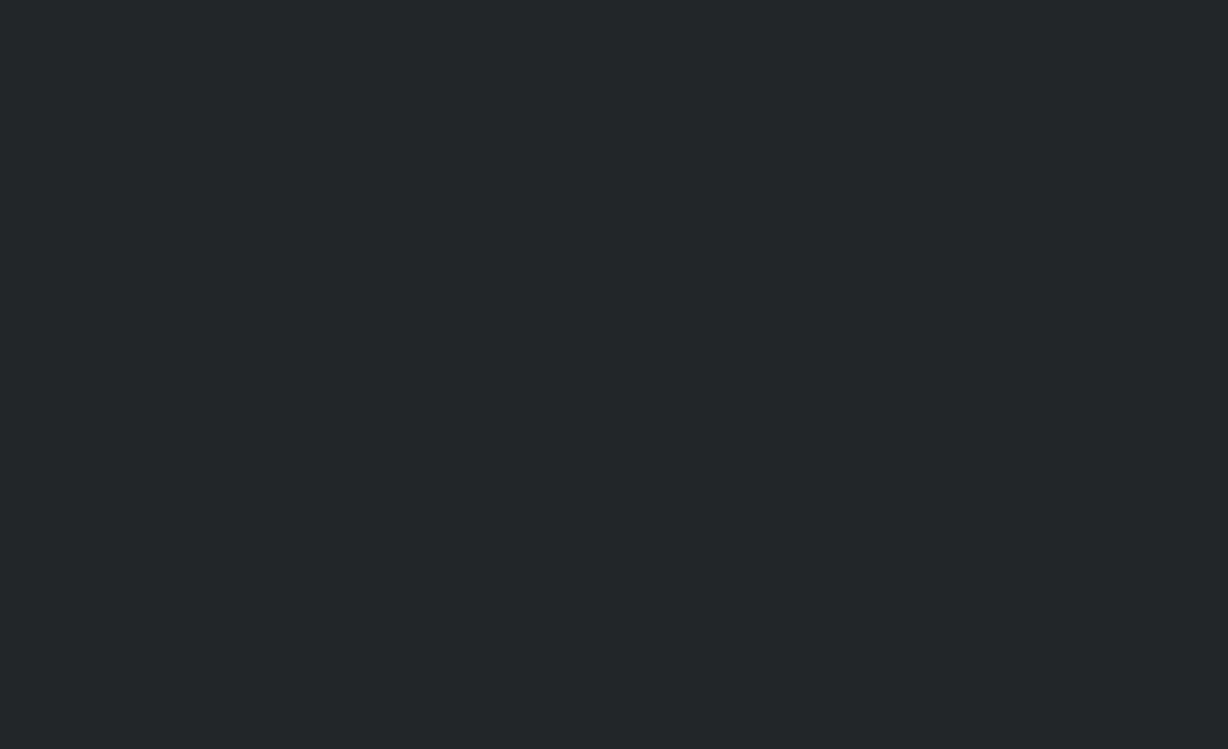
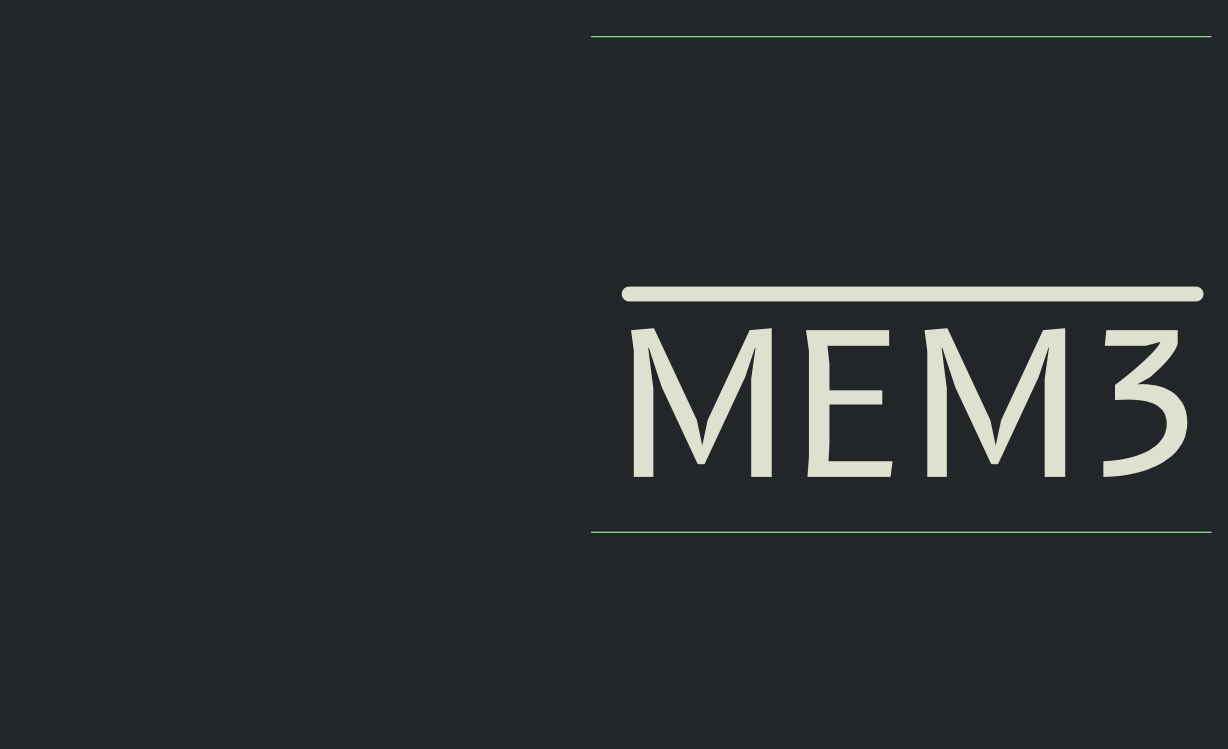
wire: none -> (591, 36) (1210, 36)
label: none -> ~{MEM3} (912, 385)
wire: none -> (591, 532) (1210, 532)

